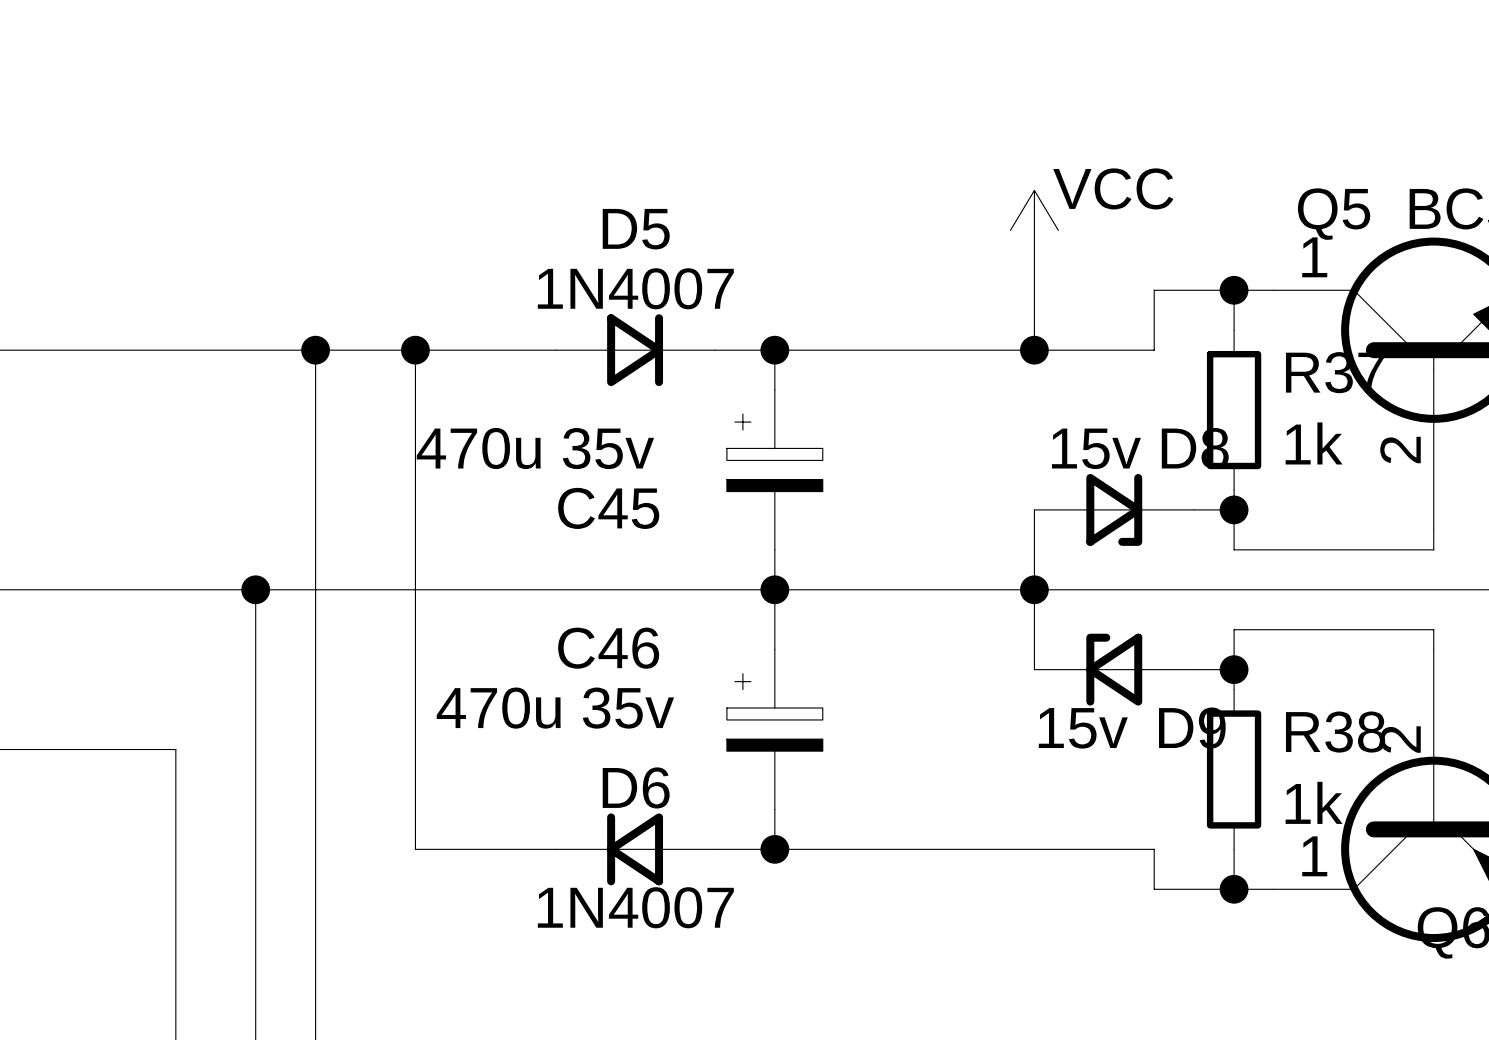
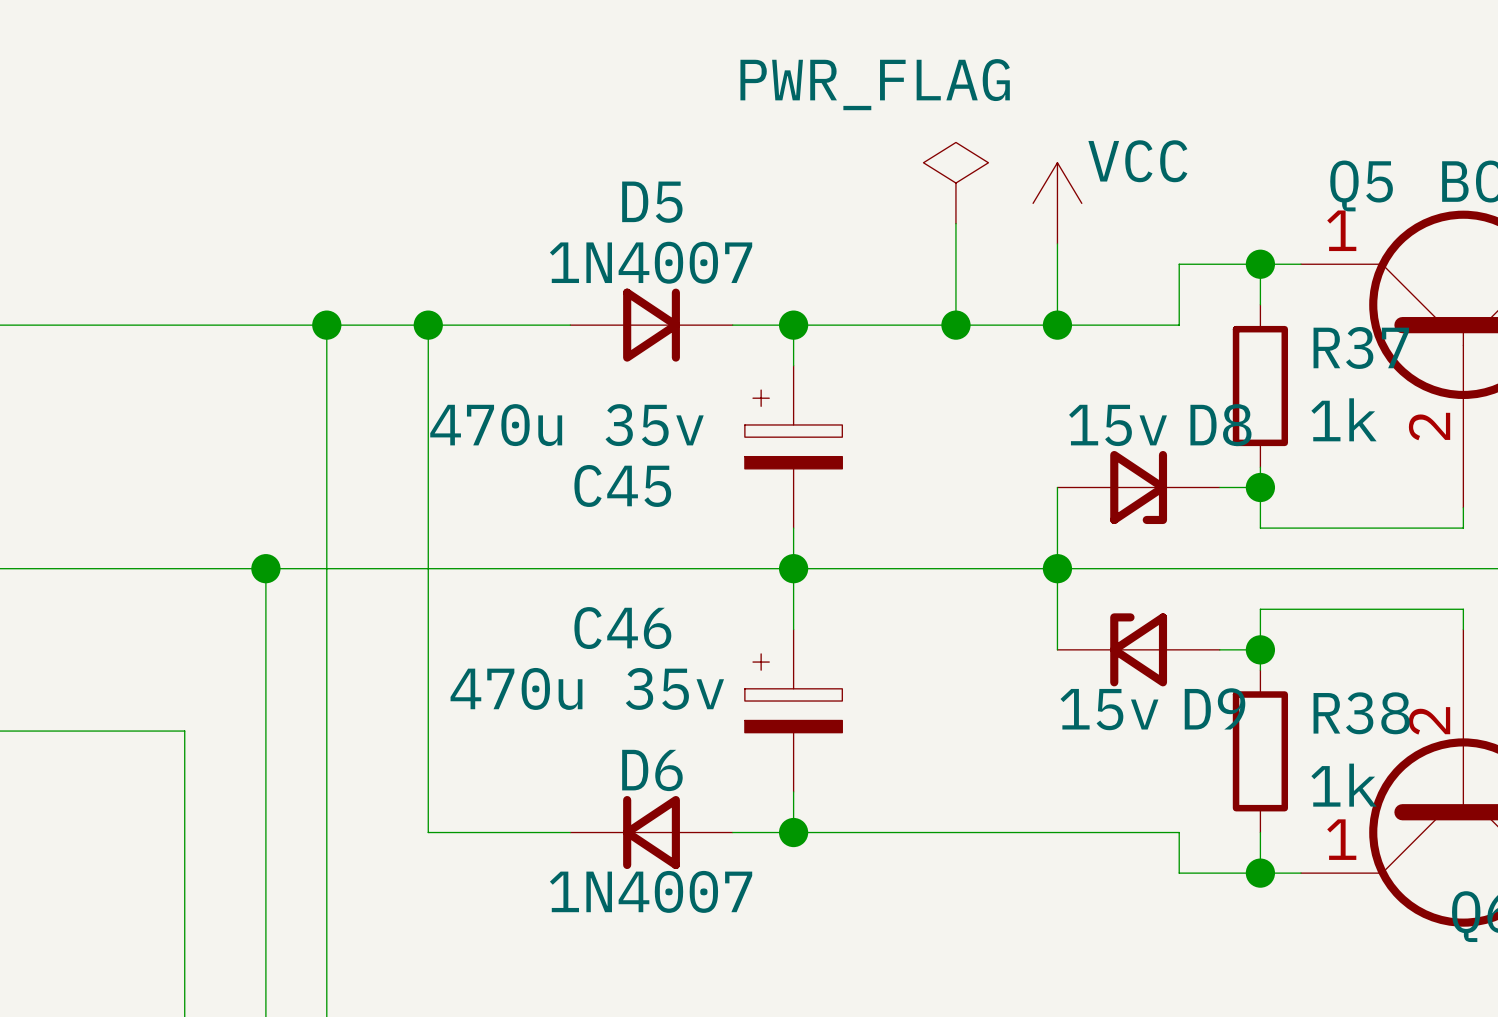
power symbol: none -> PWR_FLAG (955, 183)
wire: none -> (955, 223) (955, 325)
junction: none -> (955, 325)

